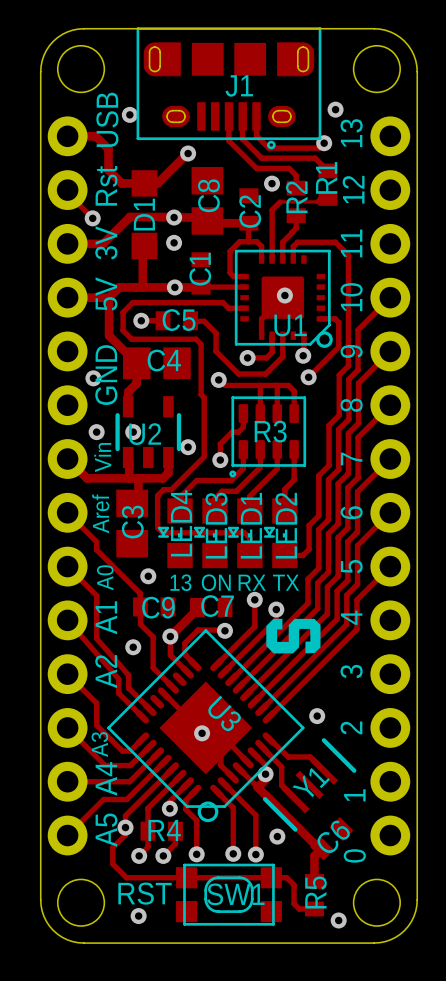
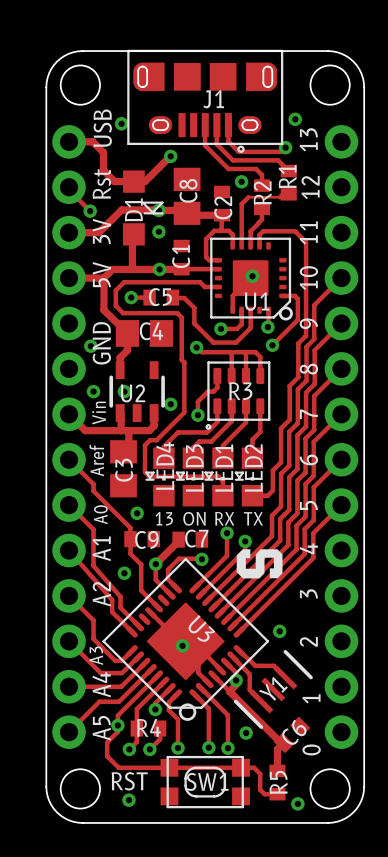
line: none -> (153, 211) (162, 202) (142, 202) (153, 213)
line: none -> (144, 213) (162, 213)

